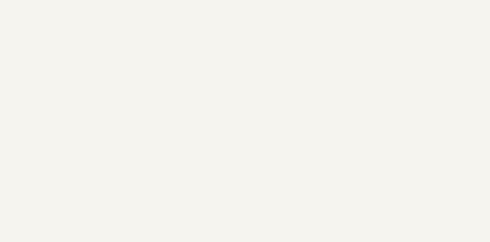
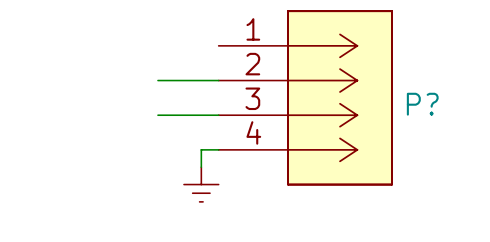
wire: none -> (157, 80) (218, 80)
P?: none -> (305, 97)
wire: none -> (157, 115) (218, 115)
wire: none -> (218, 149) (201, 149) (201, 167)
power symbol: none -> (201, 184)

